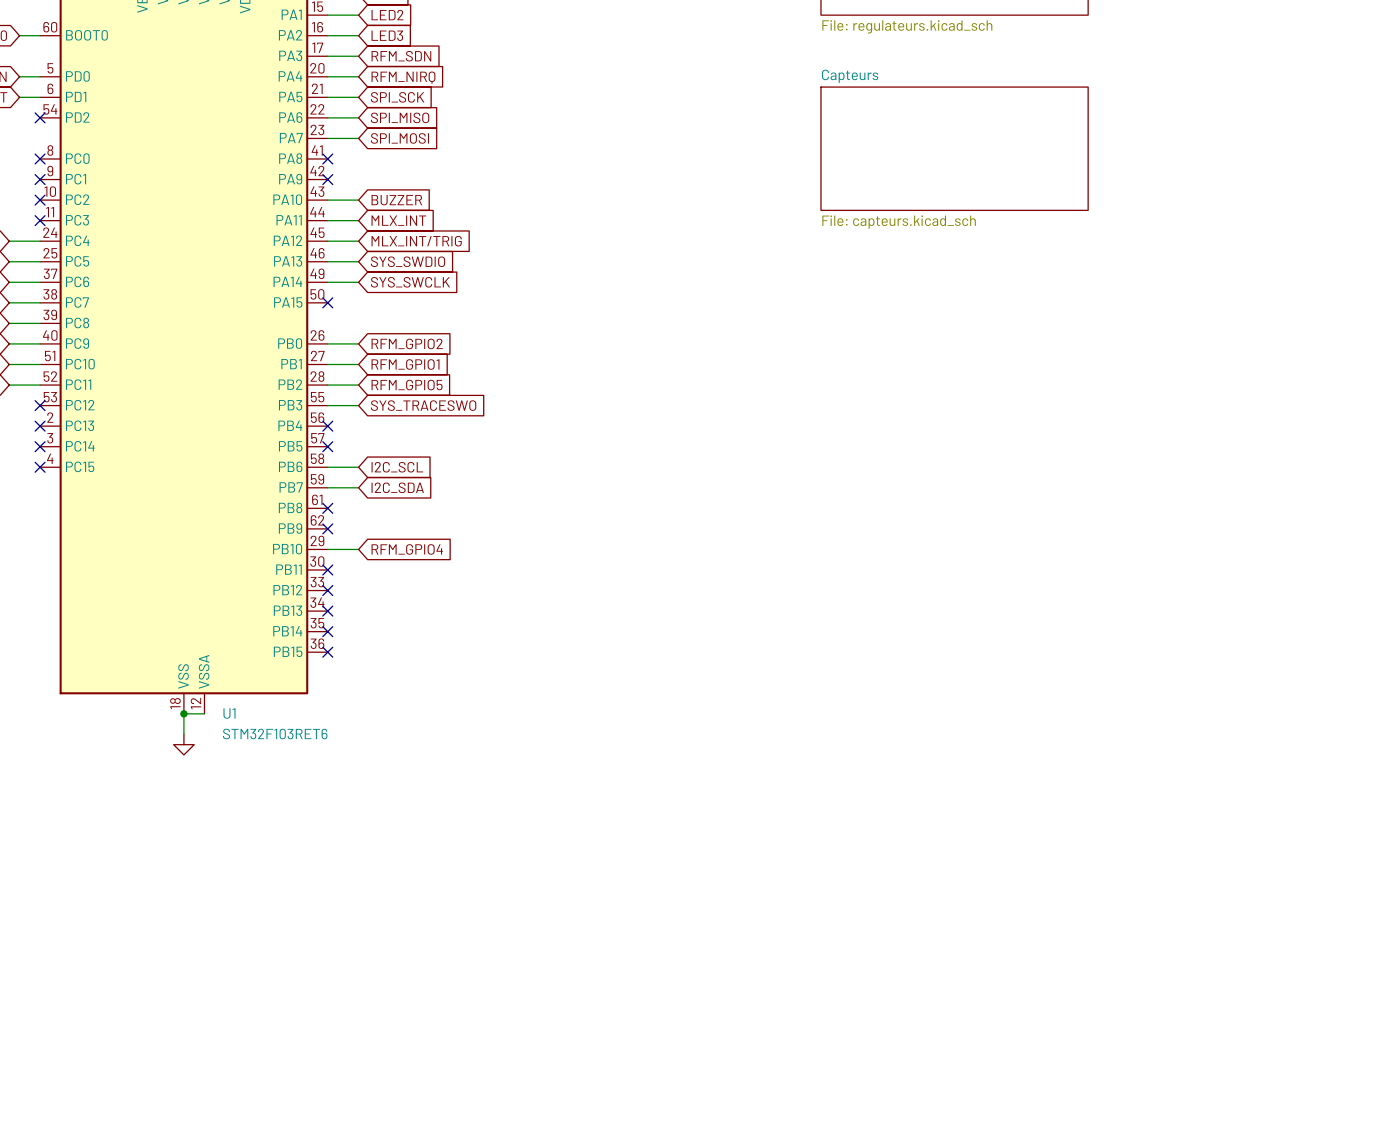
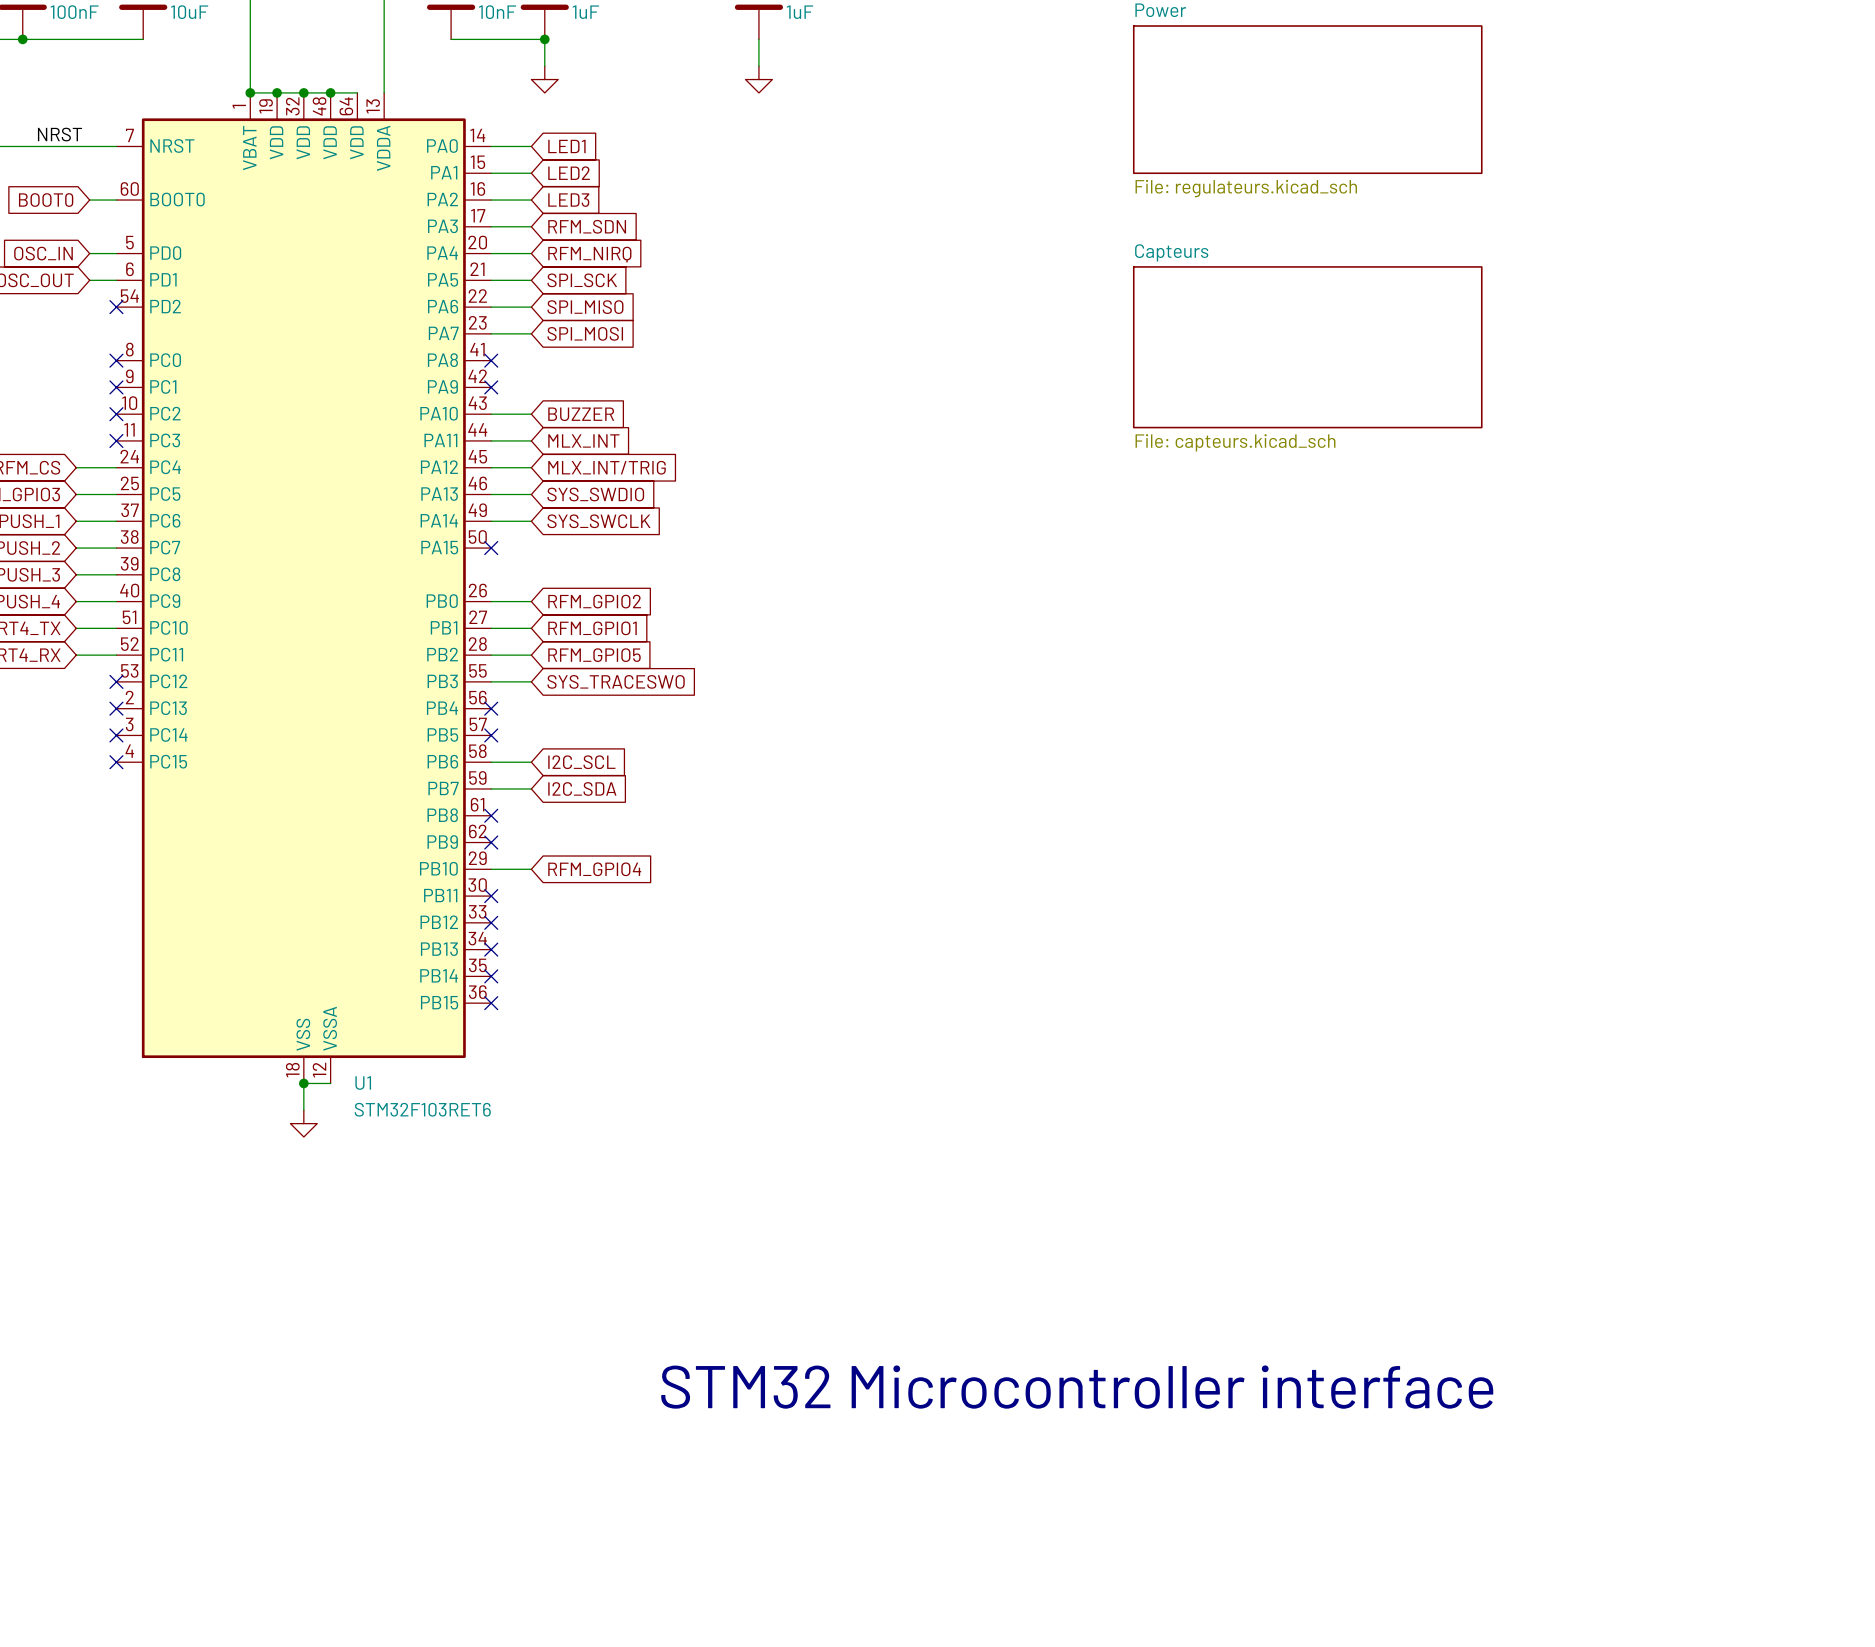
text: none -> STM32 Microcontroller interface (1077, 1387)

